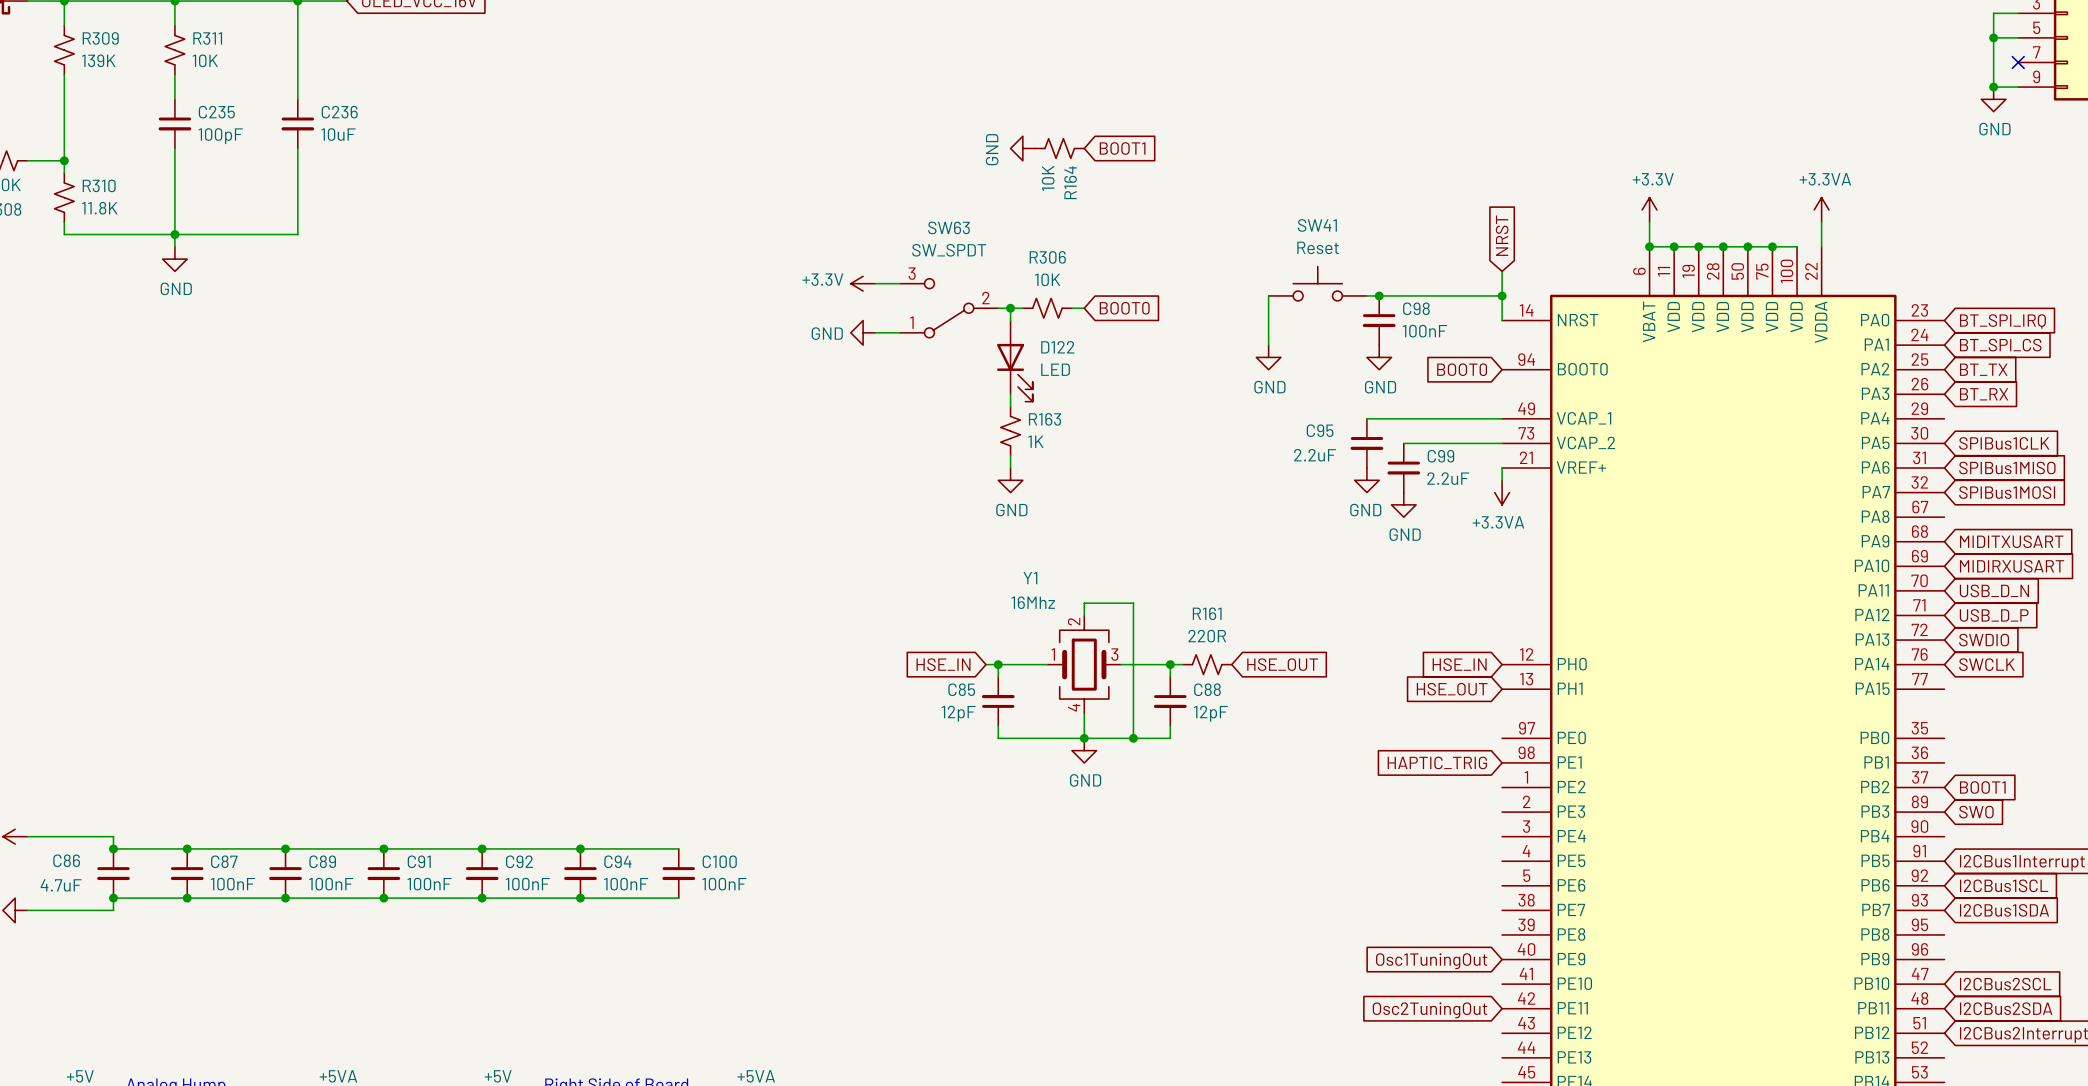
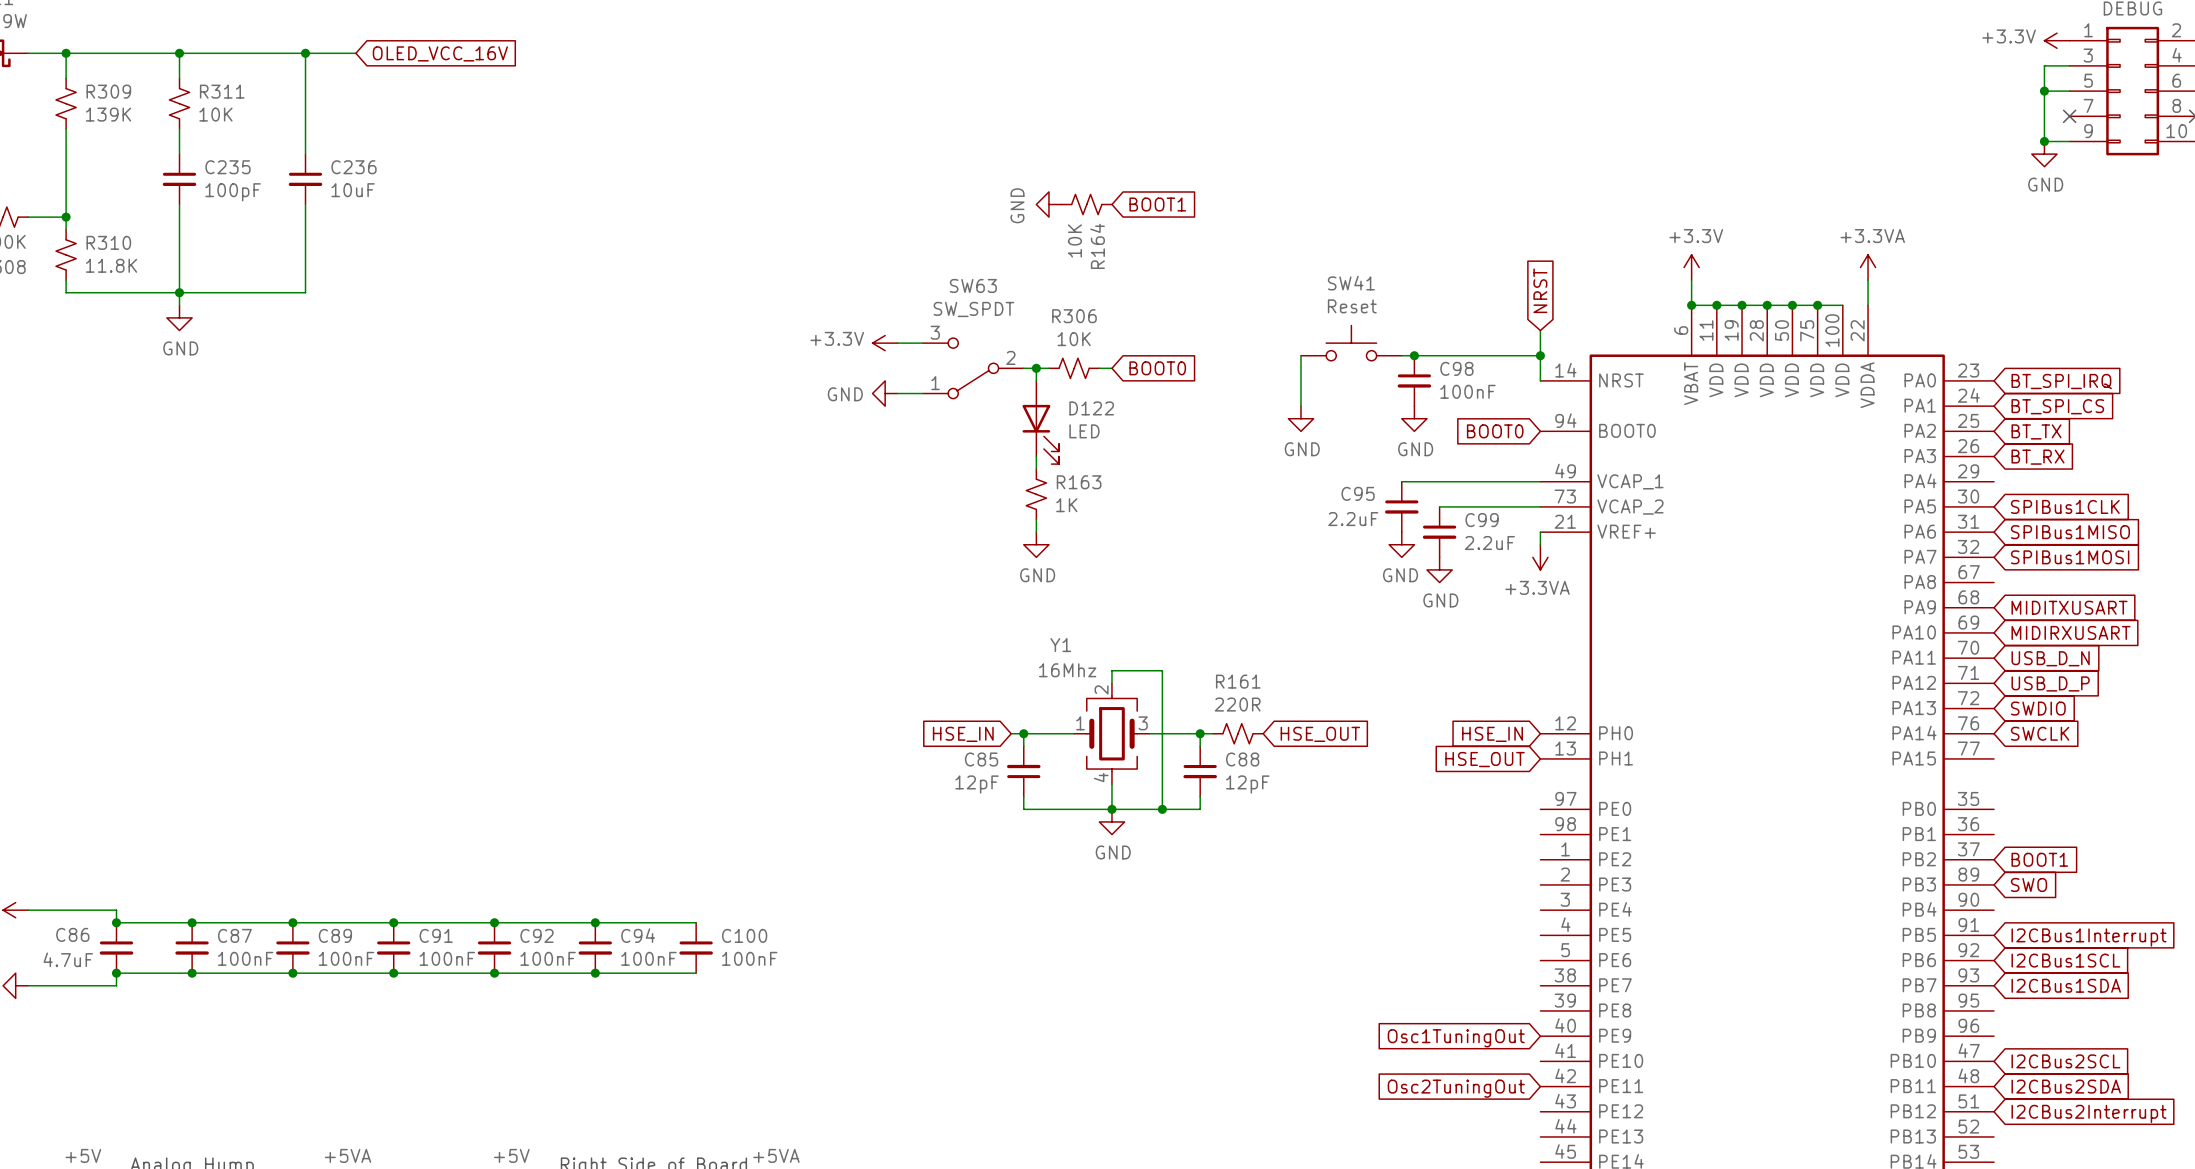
global label: HAPTIC_TRIG (1437, 762) -> none

